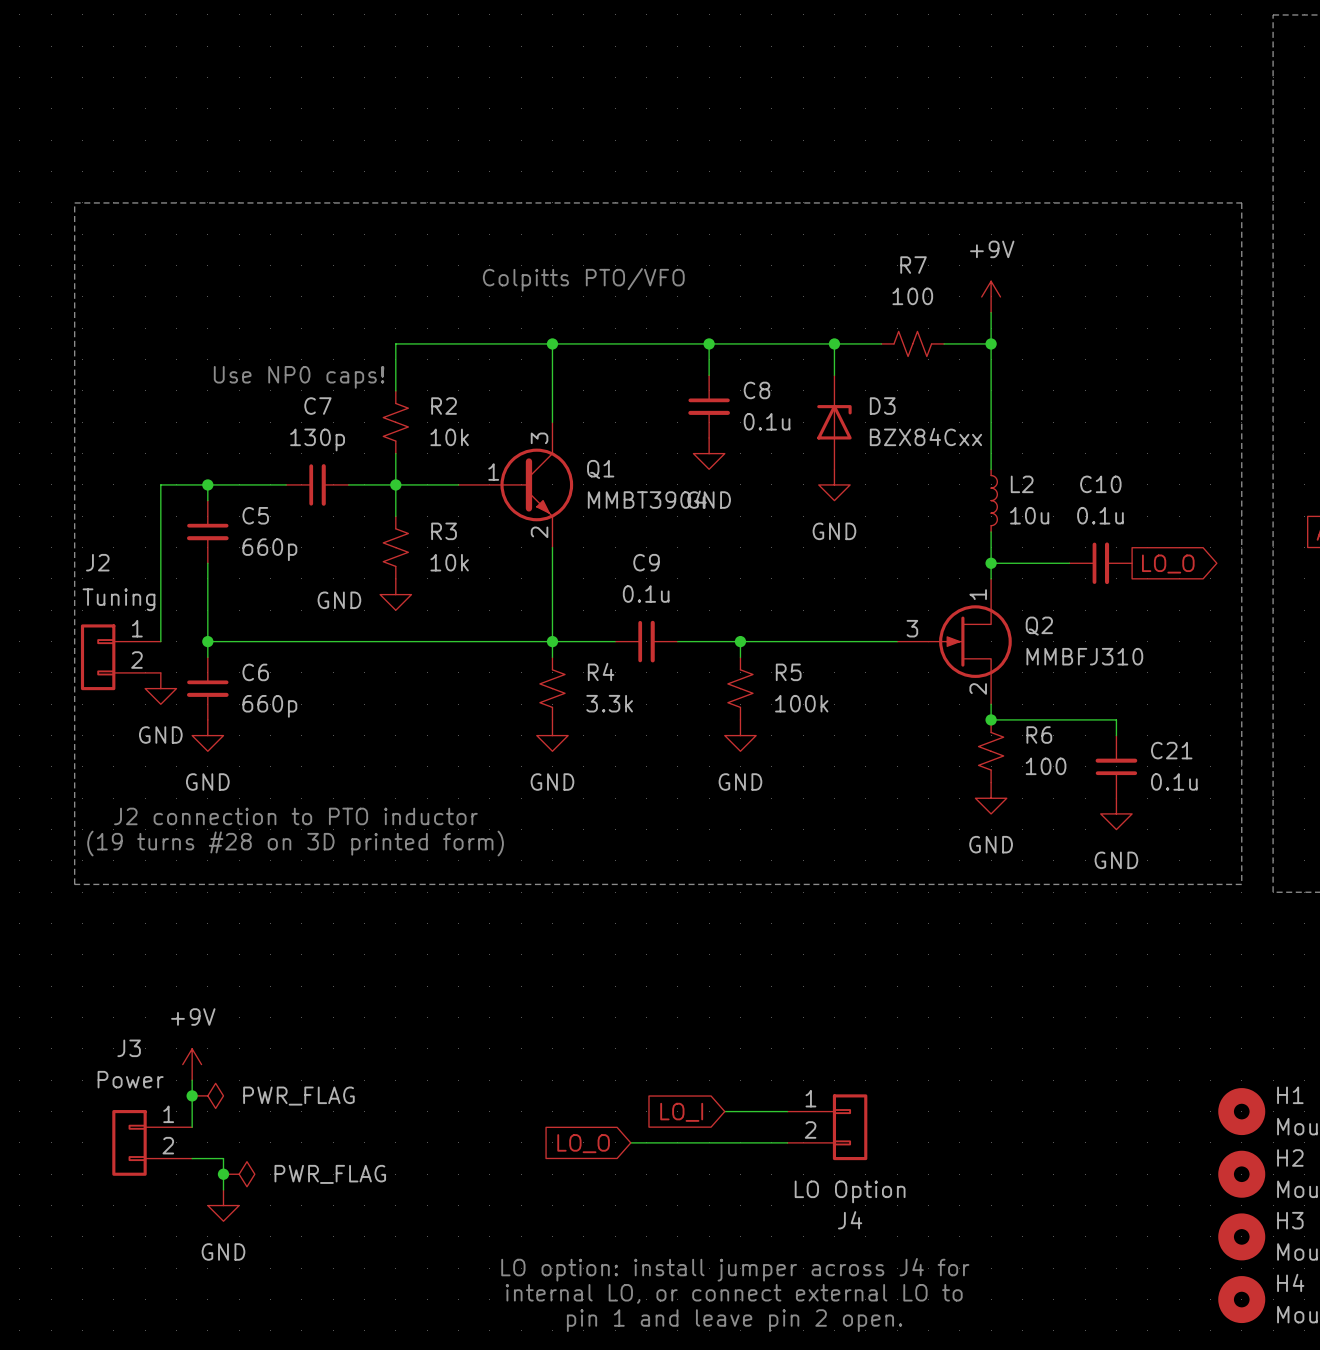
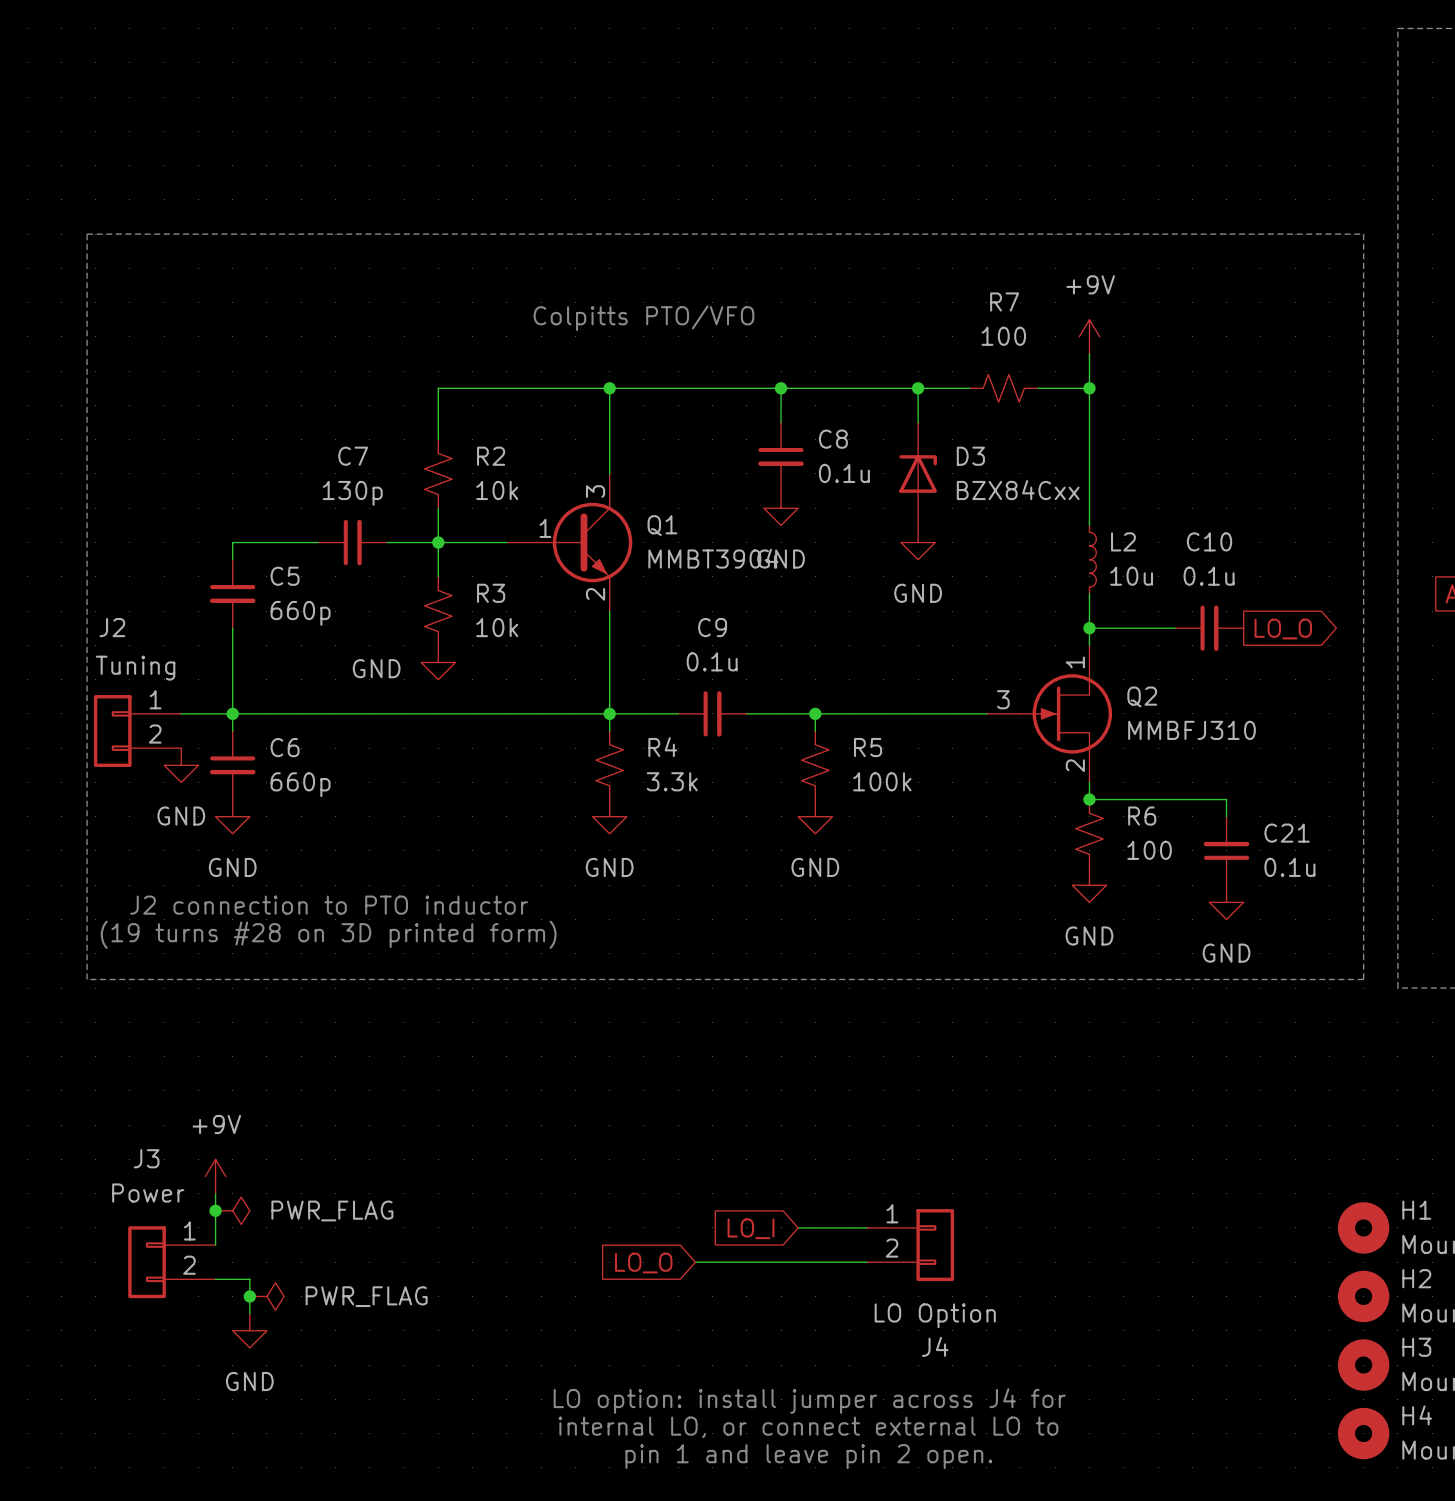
text: Use NP0 caps! (299, 377) -> none
wire: (207, 484) (160, 484) (160, 641) -> (232, 713) (181, 713)
junction: (207, 484) -> none

